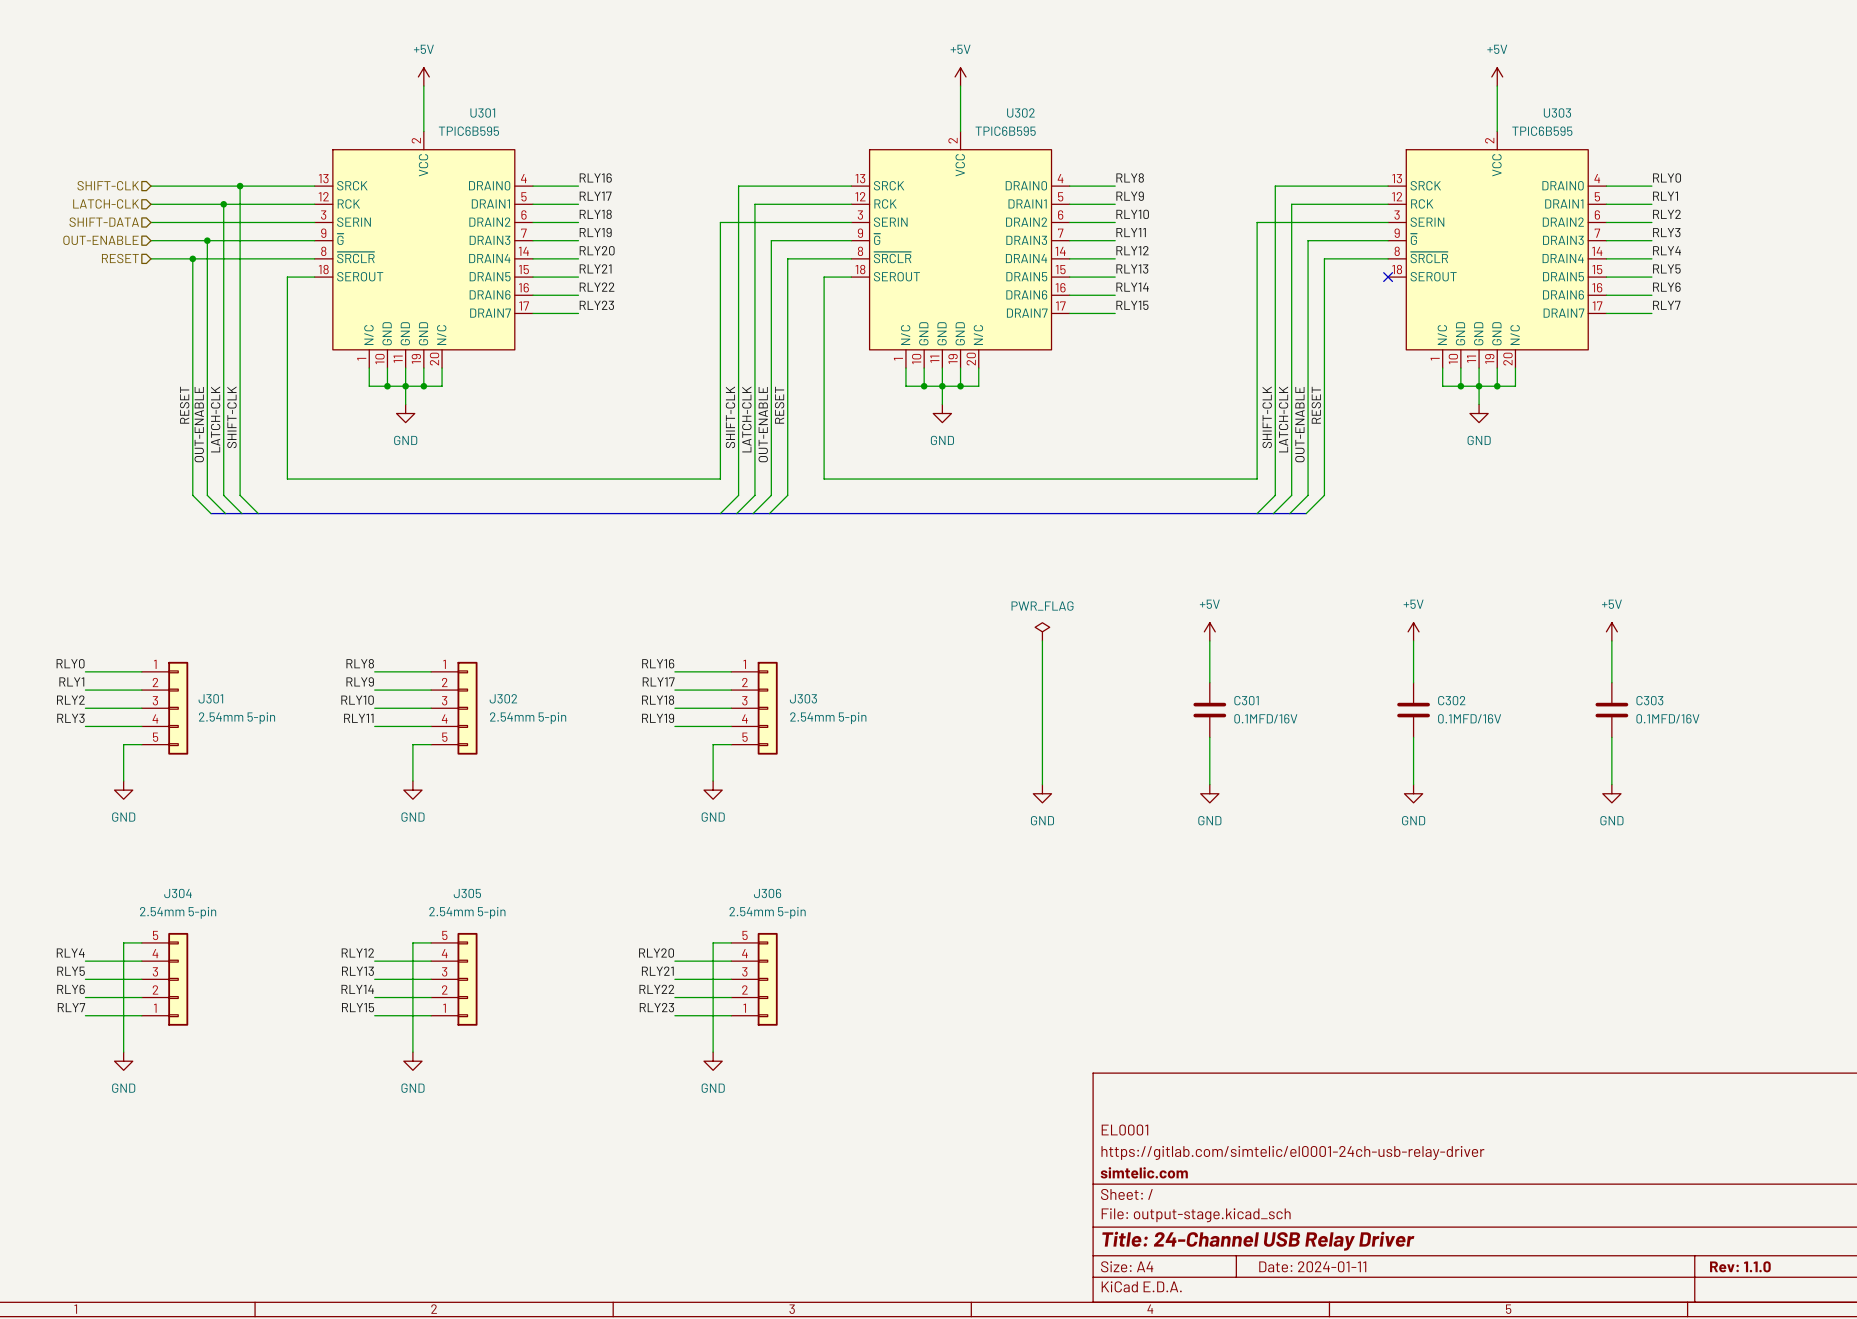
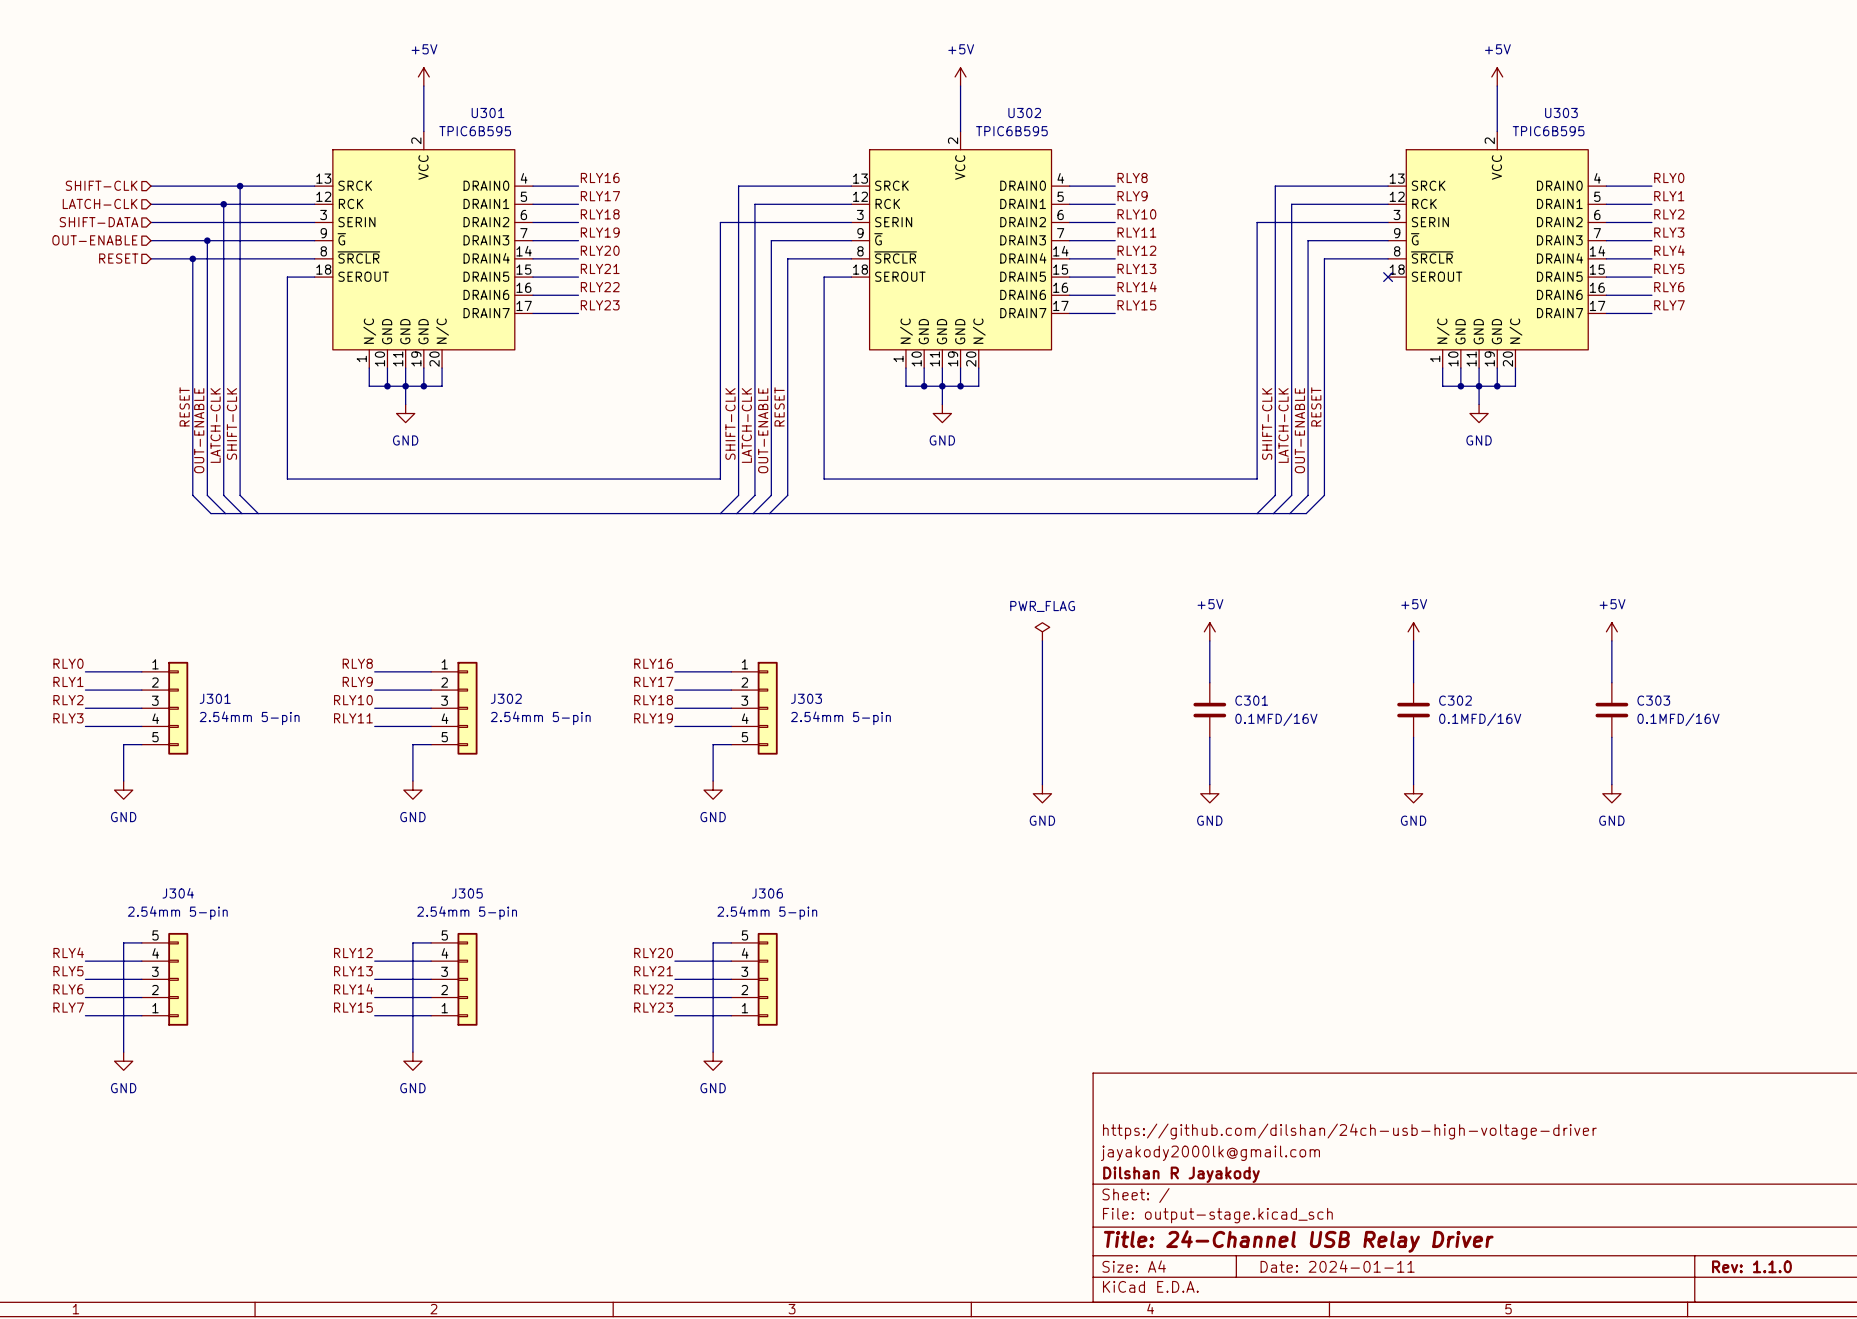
title block: EL0001 (1124, 1130) -> https://github.com/dilshan/24ch-usb-high-voltage-driver (1349, 1131)
title block: https://gitlab.com/simtelic/el0001-24ch-usb-relay-driver (1292, 1152) -> jayakody2000lk@gmail.com (1210, 1153)
title block: simtelic.com (1144, 1172) -> Dilshan R Jayakody (1181, 1174)

